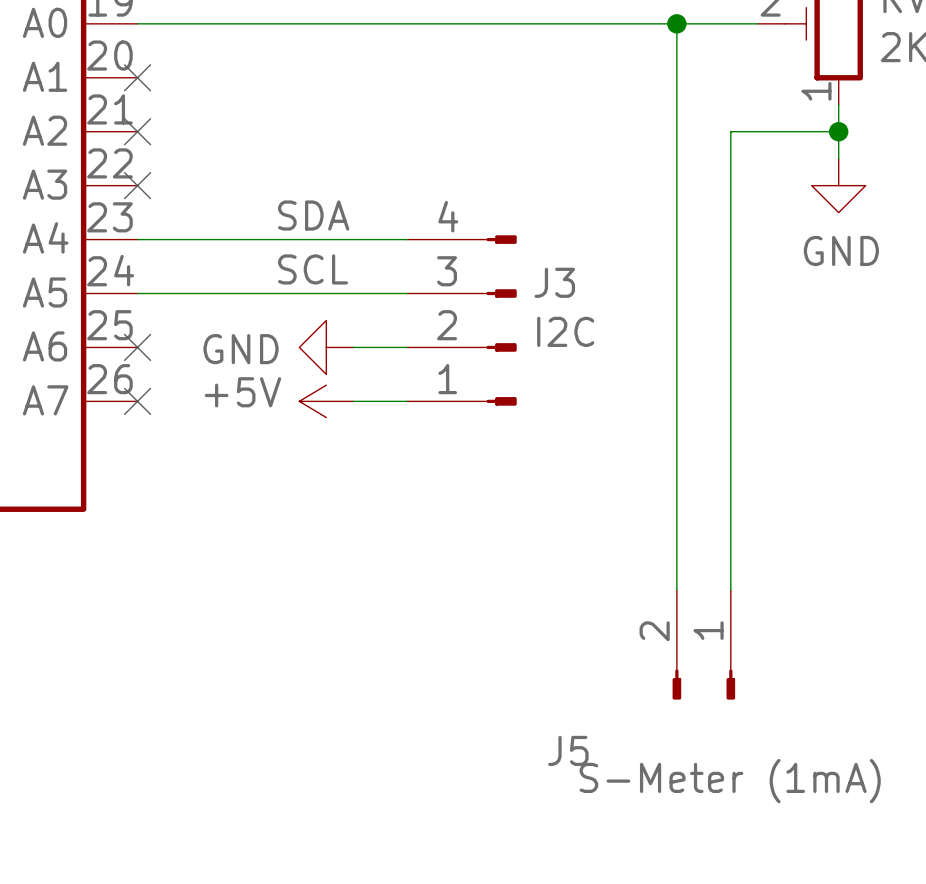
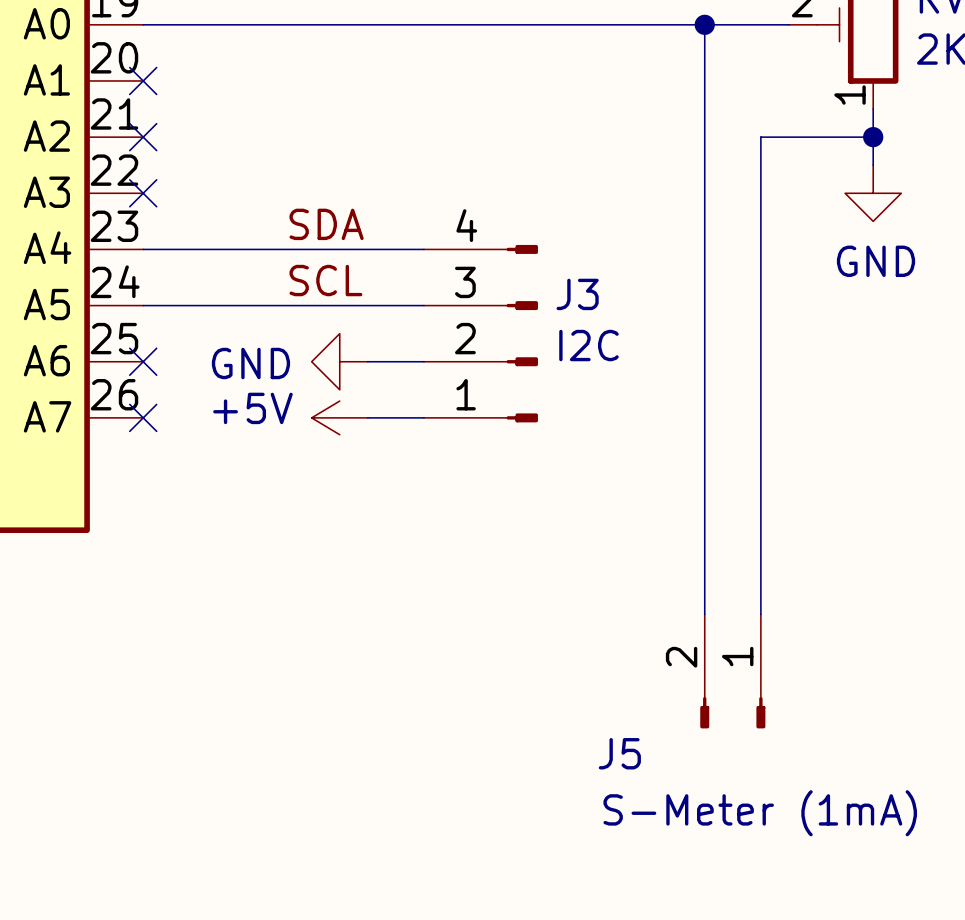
J5 name position: J5 (568, 750) -> J5 (619, 753)

